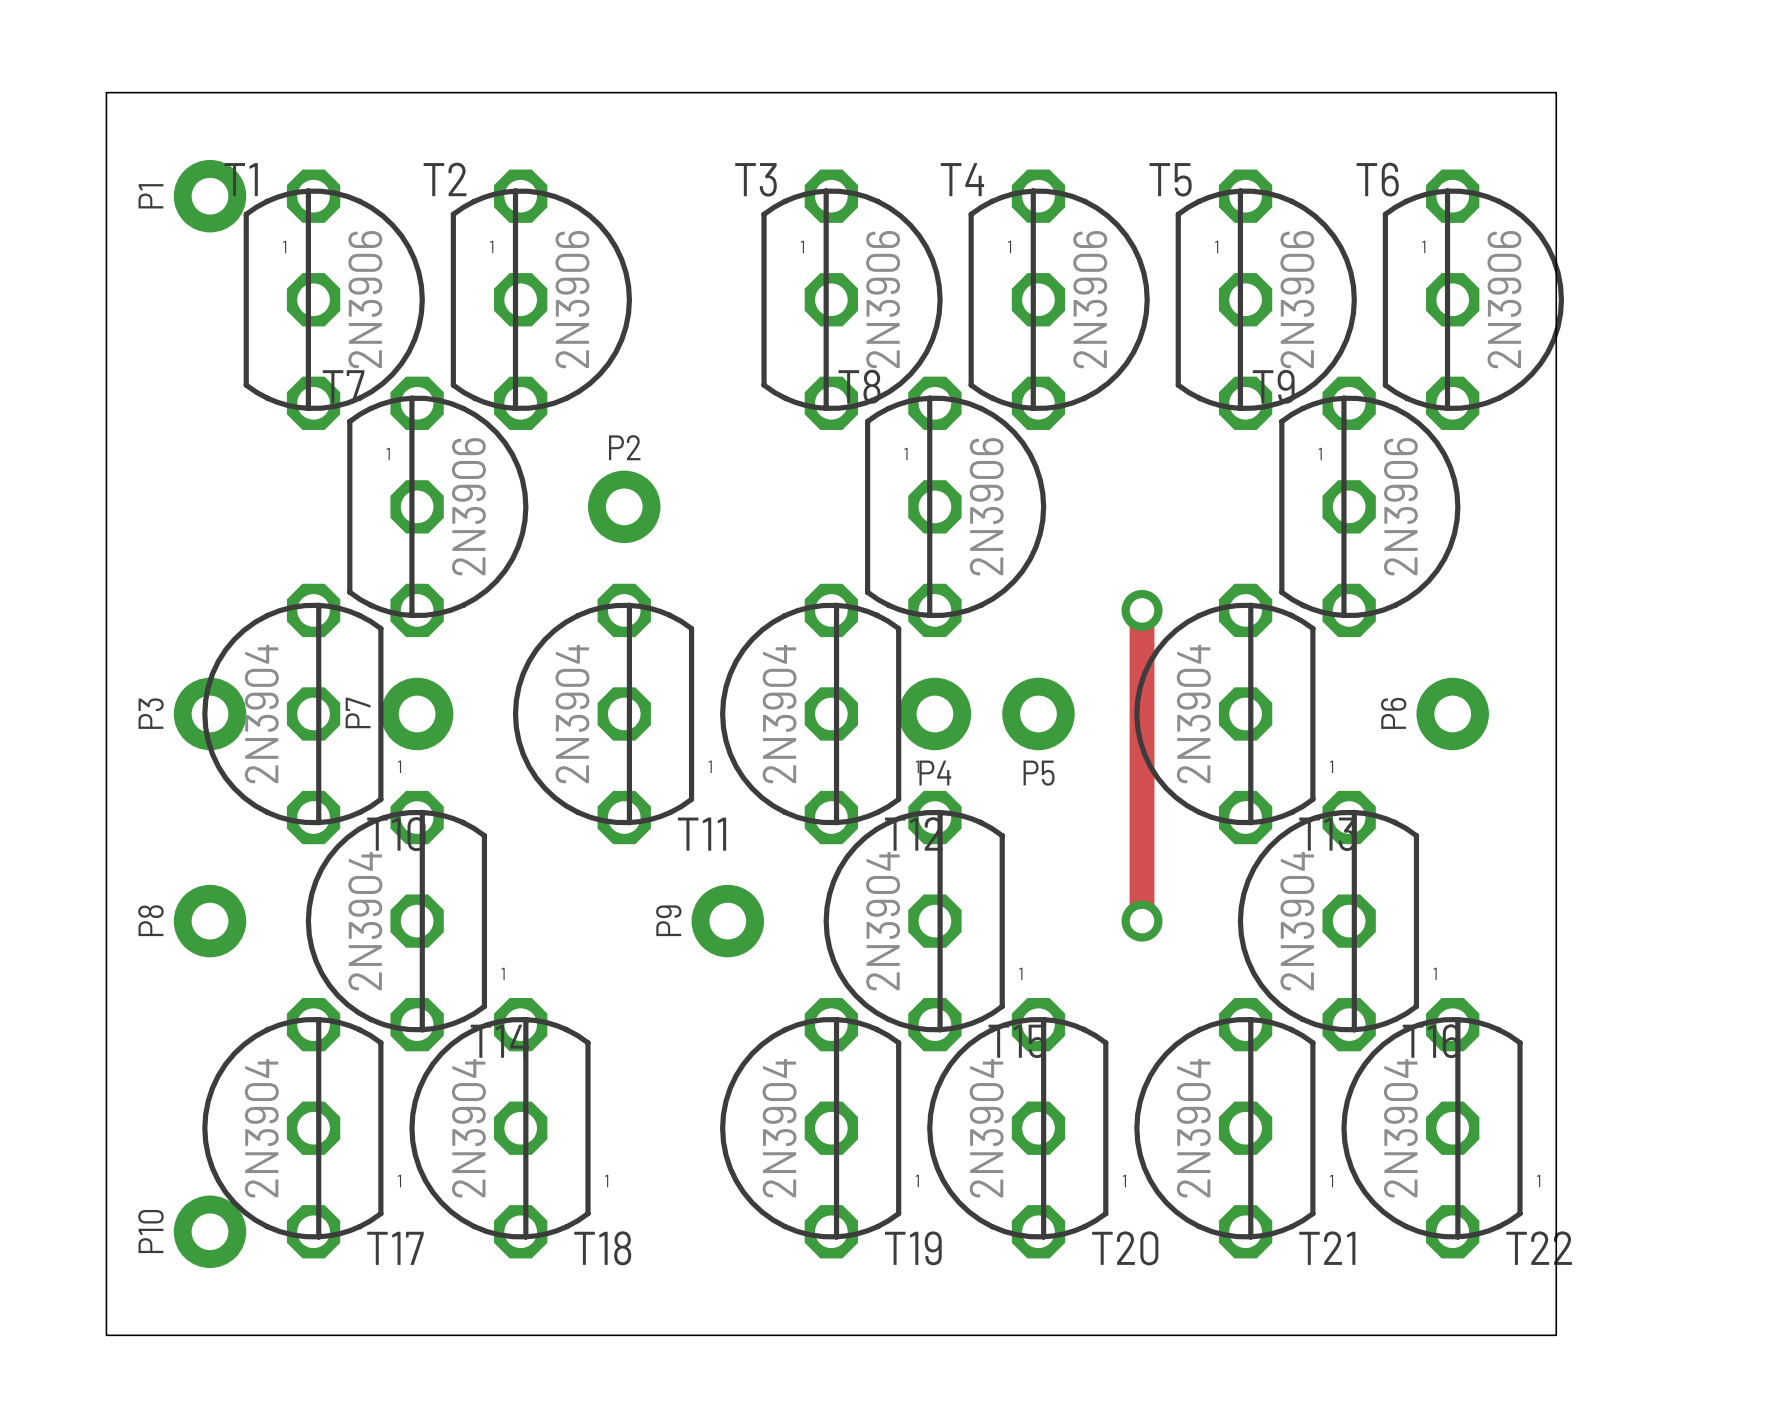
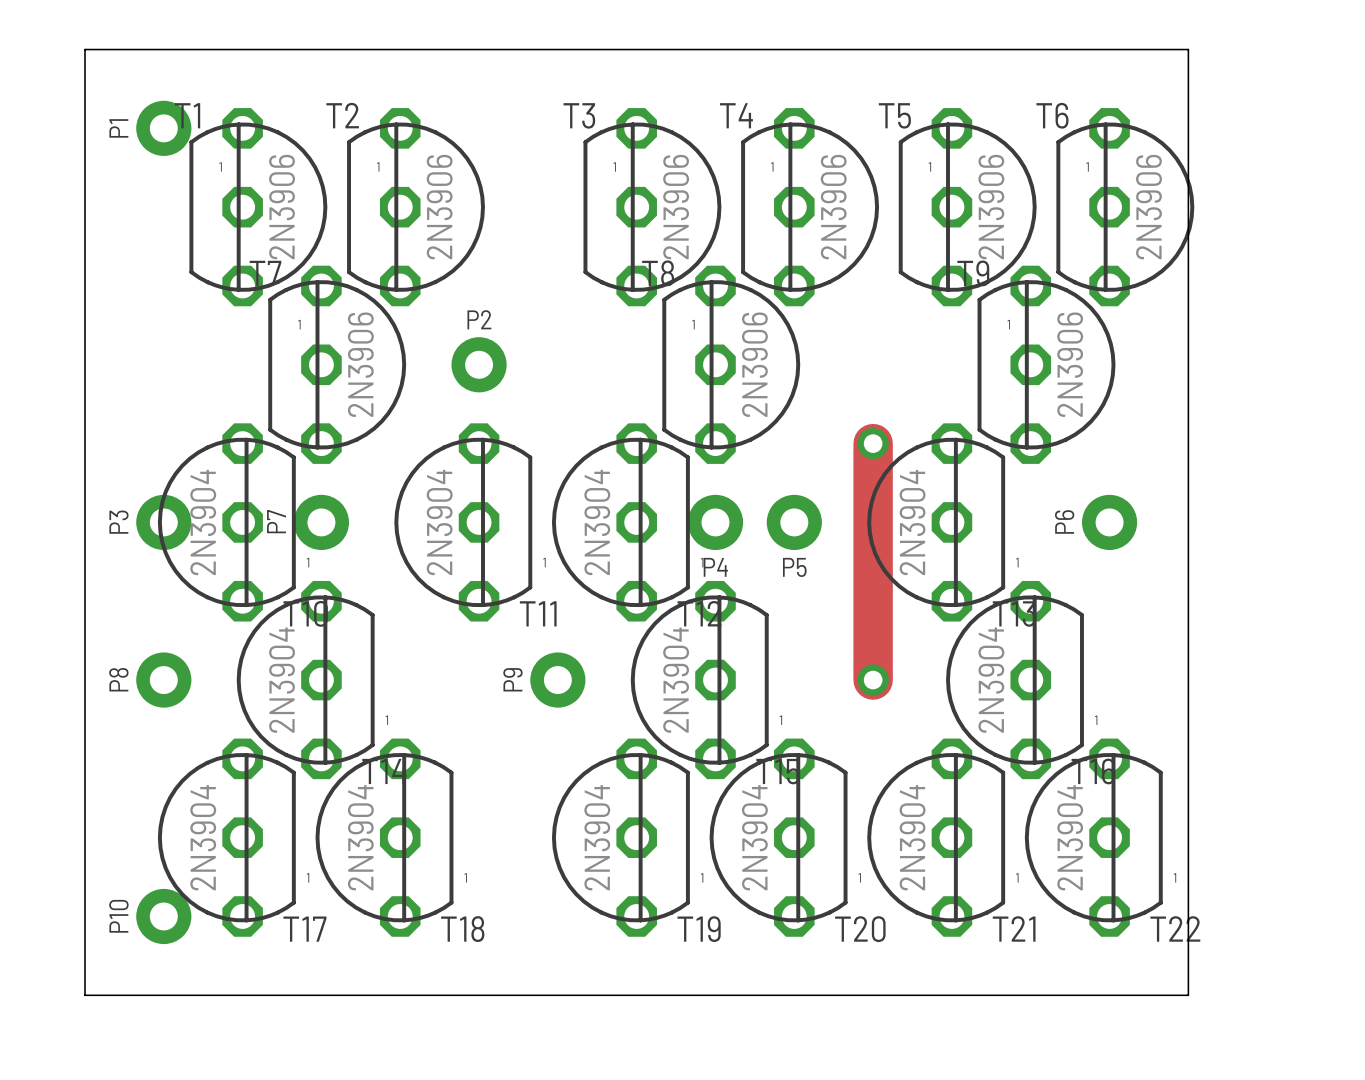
track width: thin (1142, 610) (1142, 921) -> thick (873, 443) (873, 680)

